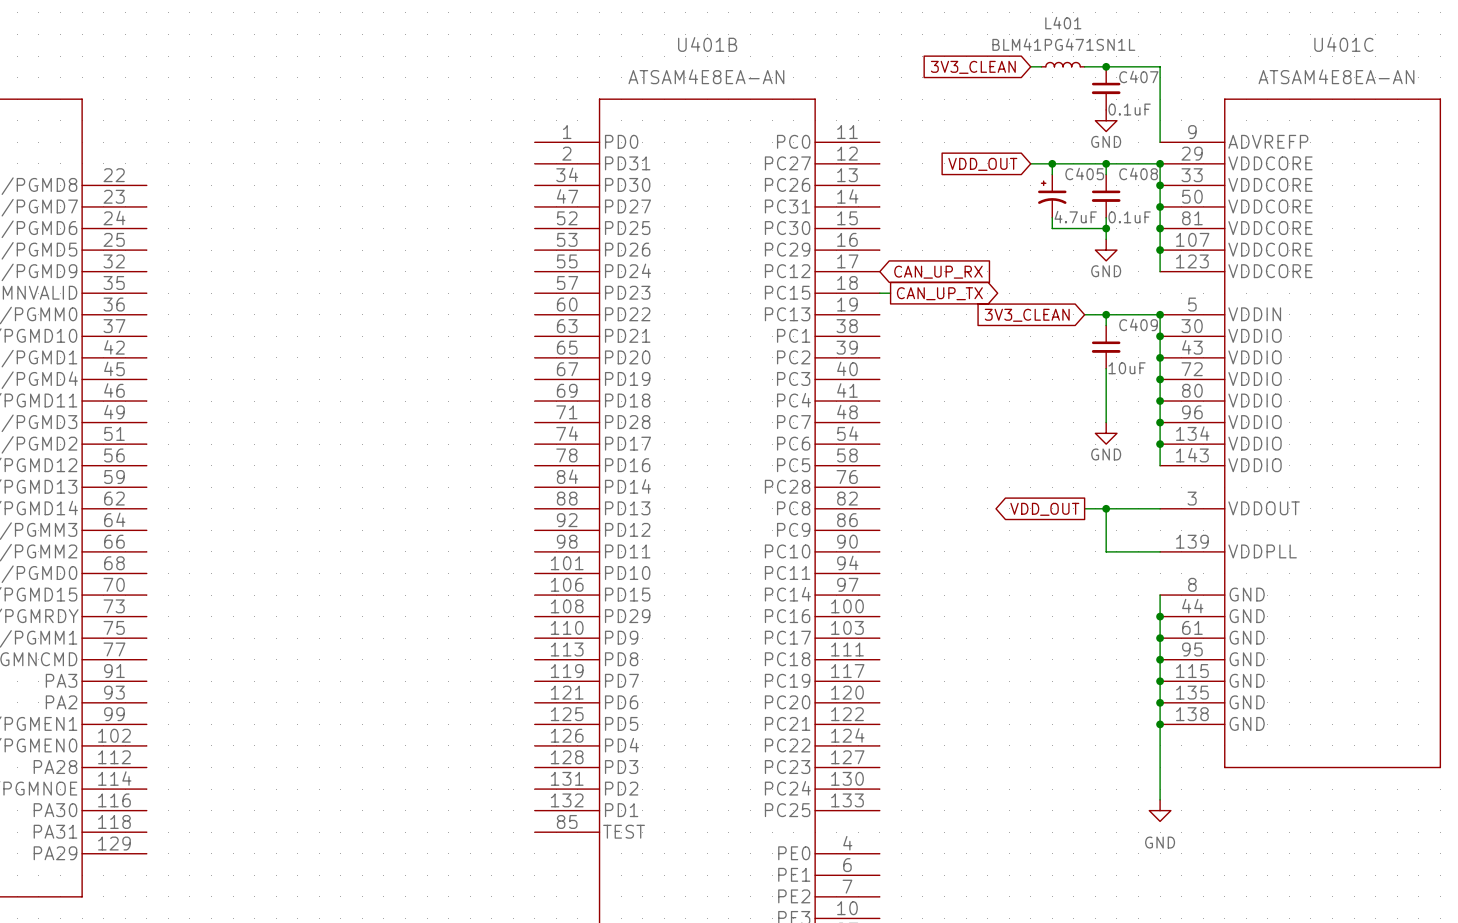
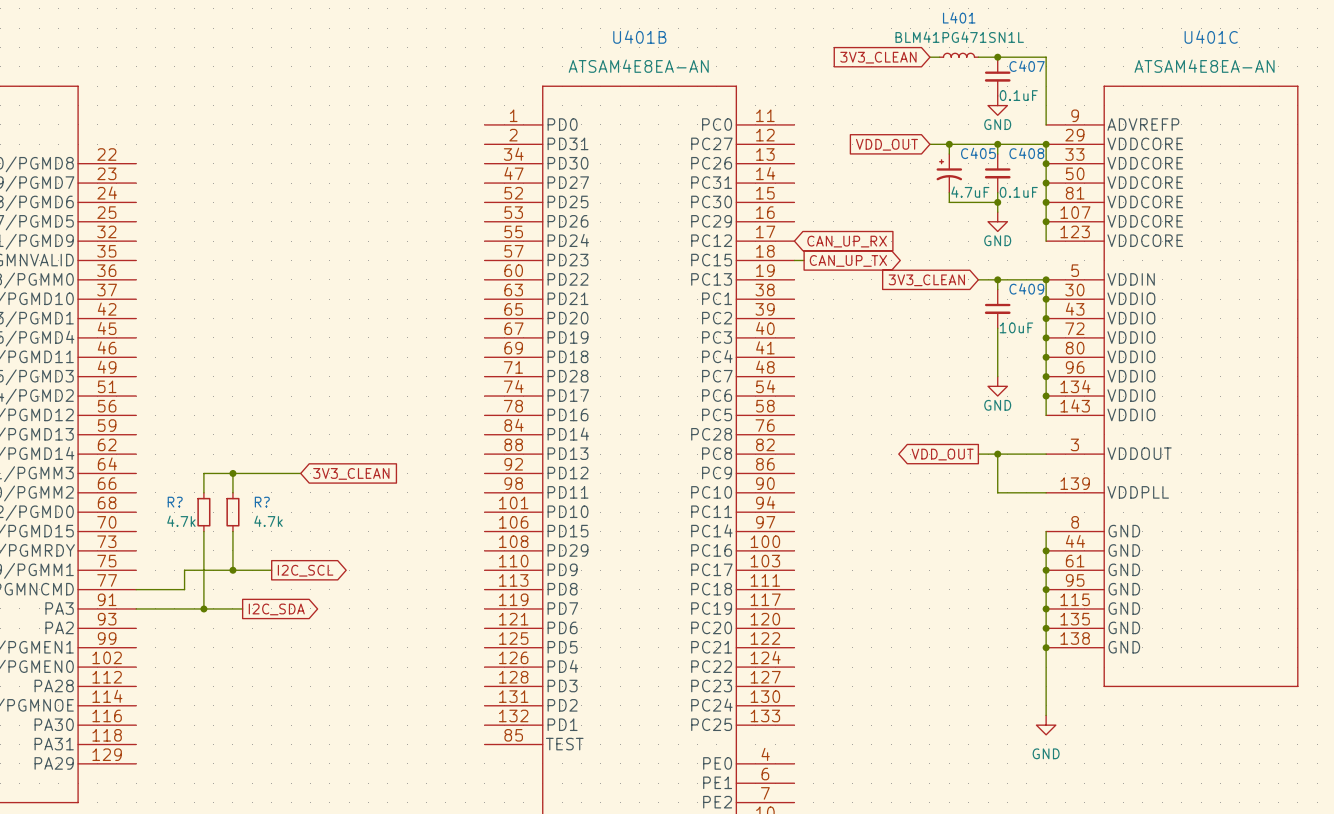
wire: none -> (232, 473) (232, 492)
junction: none -> (232, 473)
wire: none -> (300, 473) (203, 473) (203, 492)
global label: none -> 3V3_CLEAN (351, 473)
R?: none -> 4.7k (203, 512)
R?: none -> 4.7k (232, 512)
wire: none -> (203, 531) (203, 608)
wire: none -> (232, 531) (232, 570)
junction: none -> (232, 570)
wire: none -> (271, 570) (184, 570) (184, 589) (136, 589)
global label: none -> I2C_SCL (305, 570)
wire: none -> (136, 608) (242, 608)
junction: none -> (203, 608)
global label: none -> I2C_SDA (276, 609)

